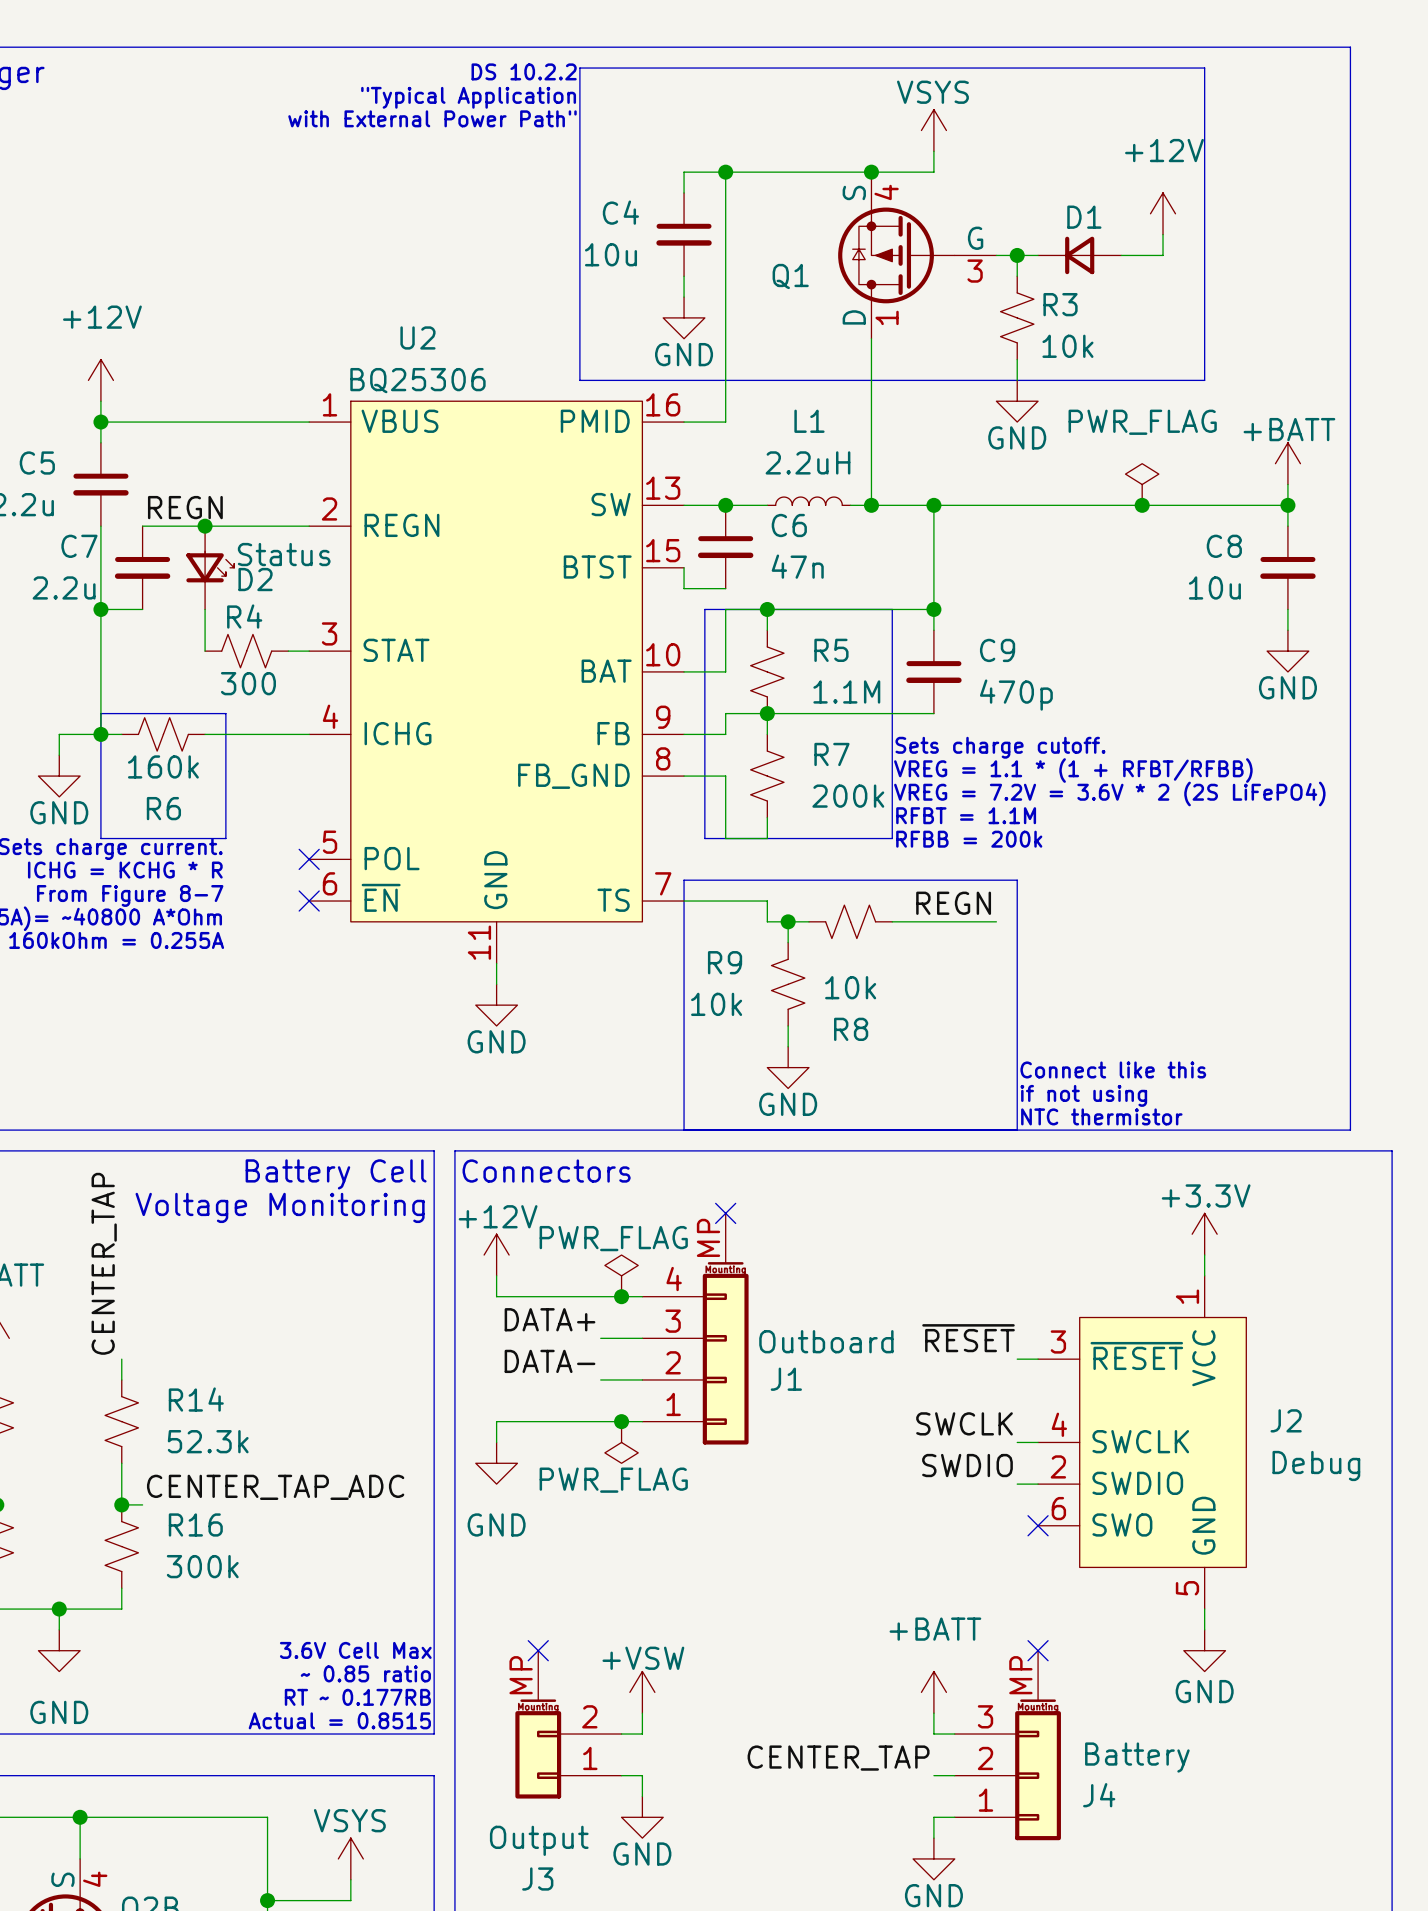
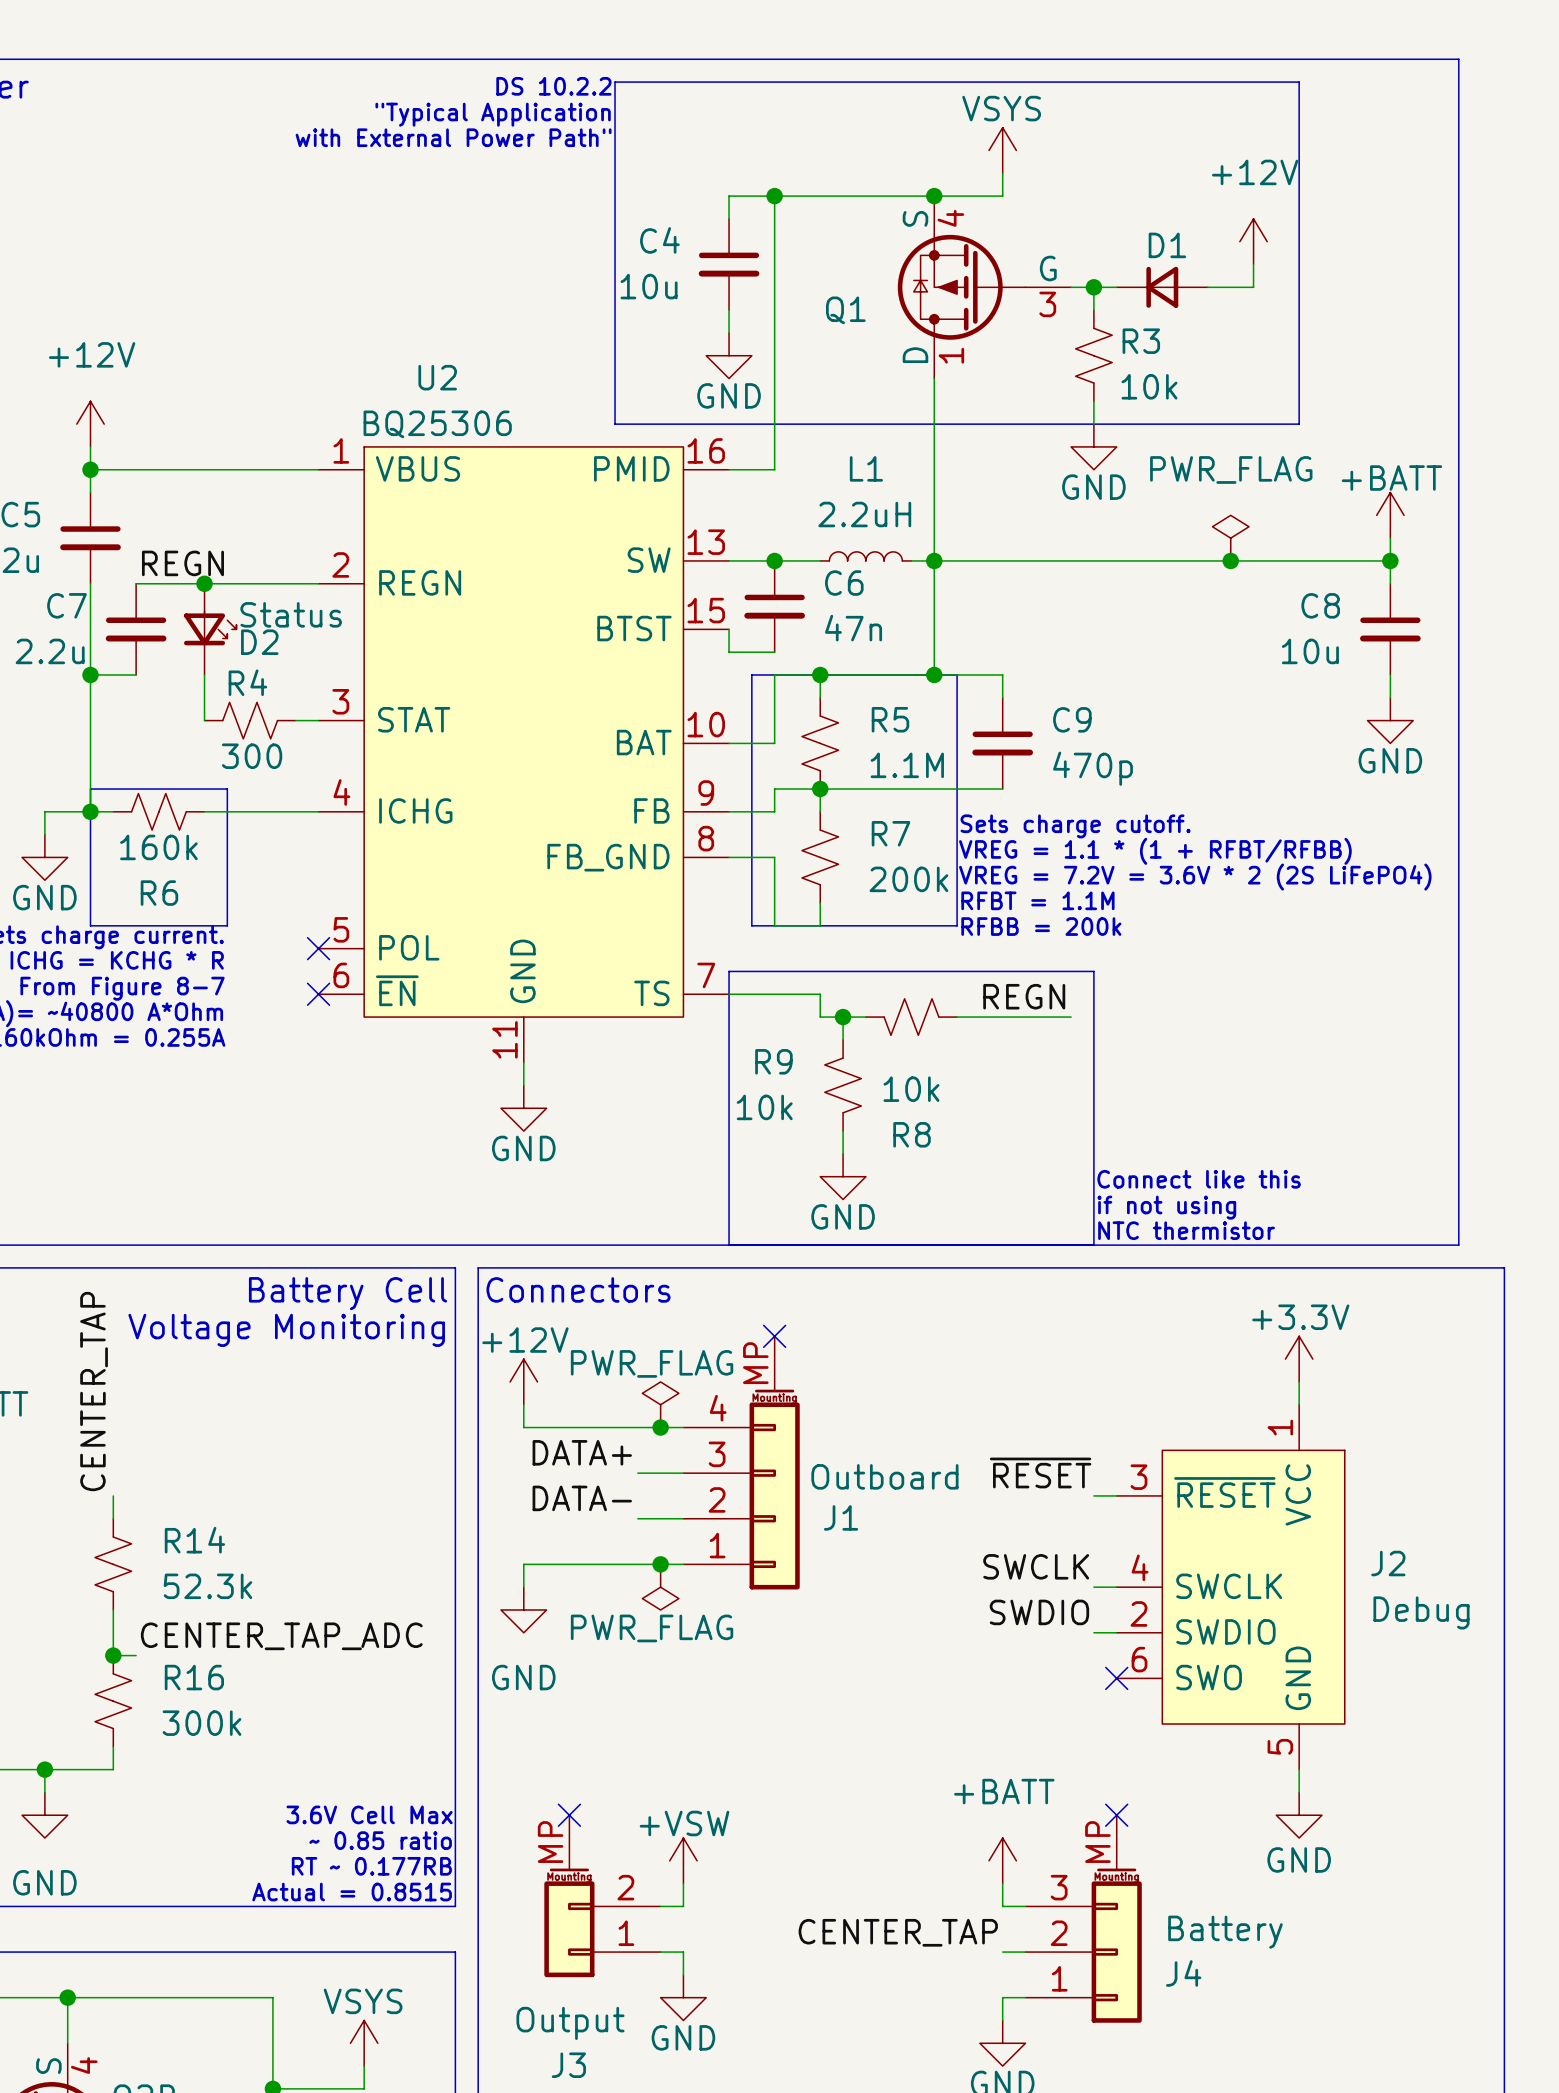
wire: (933, 505) (933, 609) -> (934, 560) (934, 674)
junction: (933, 505) -> none
junction: none -> (934, 674)
junction: (933, 609) -> none

